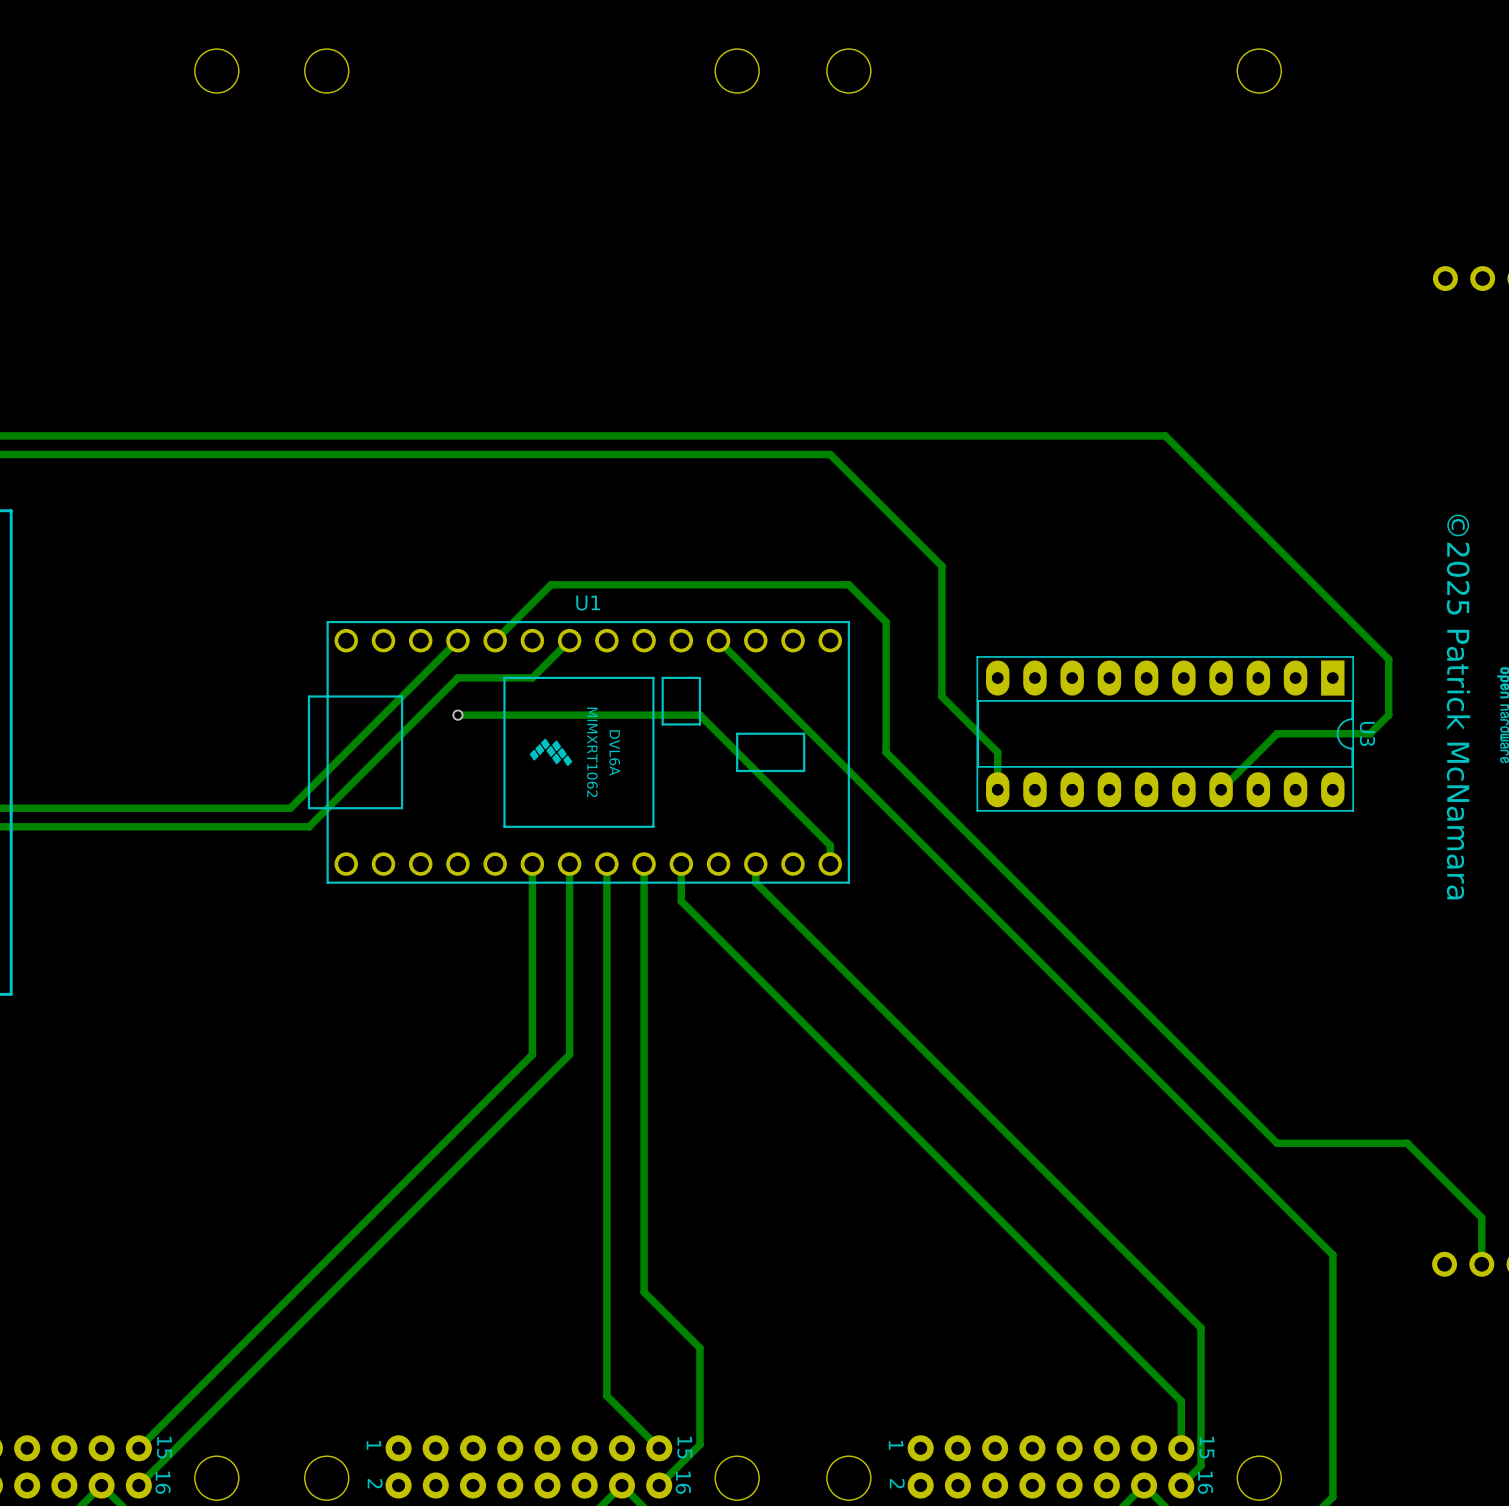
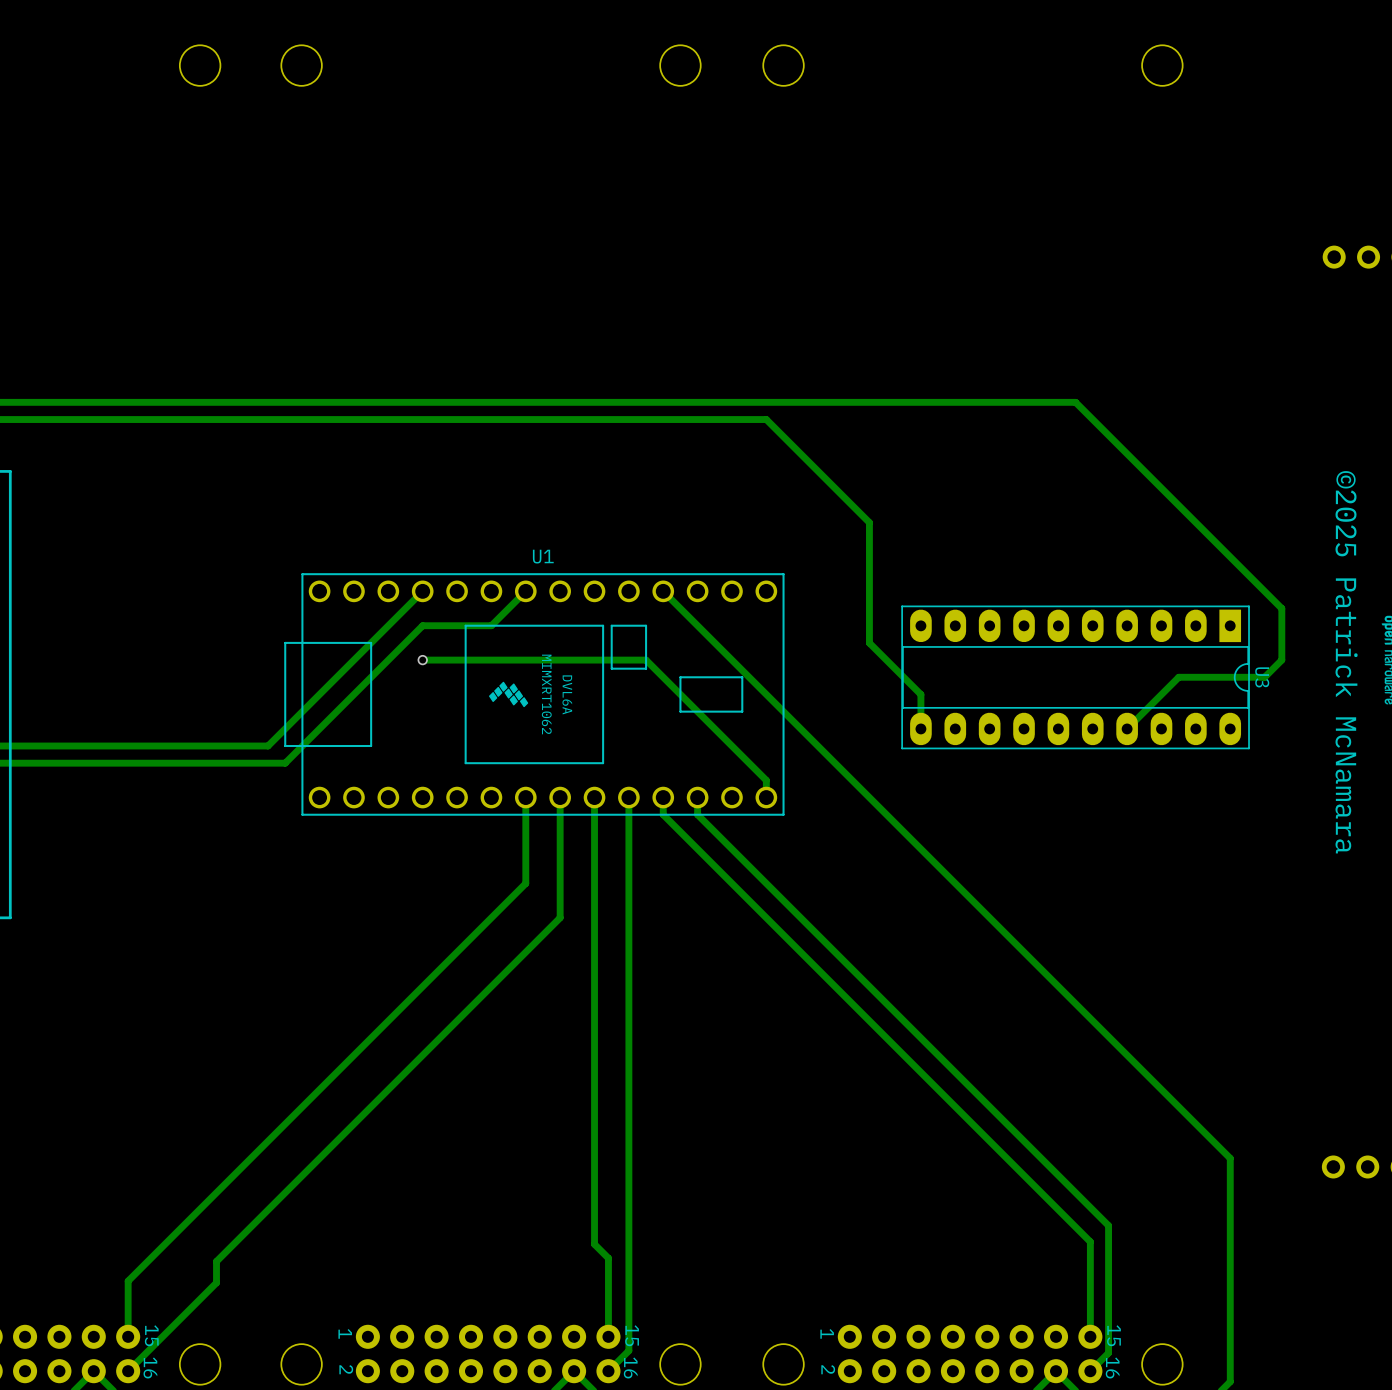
track: (495, 640) (551, 584) (848, 584) (886, 622) (886, 752) (1277, 1143) (1407, 1143) (1481, 1217) (1481, 1264) -> none
track: (532, 864) (532, 1054) (138, 1448) -> (525, 883) (128, 1281) (128, 1336)
track: (681, 901) (1181, 1401) -> (663, 797) (663, 814) (1090, 1241) (1090, 1293)
track: none -> (628, 831) (628, 1350)
track: (569, 957) (569, 1054) (234, 1389) -> (560, 917) (216, 1261) (216, 1282)
track: (606, 994) (606, 1395) (659, 1448) -> none
track: (644, 1292) (699, 1348) (699, 1444) (681, 1463) -> (594, 1192) (594, 1244) (608, 1258) (608, 1336)

